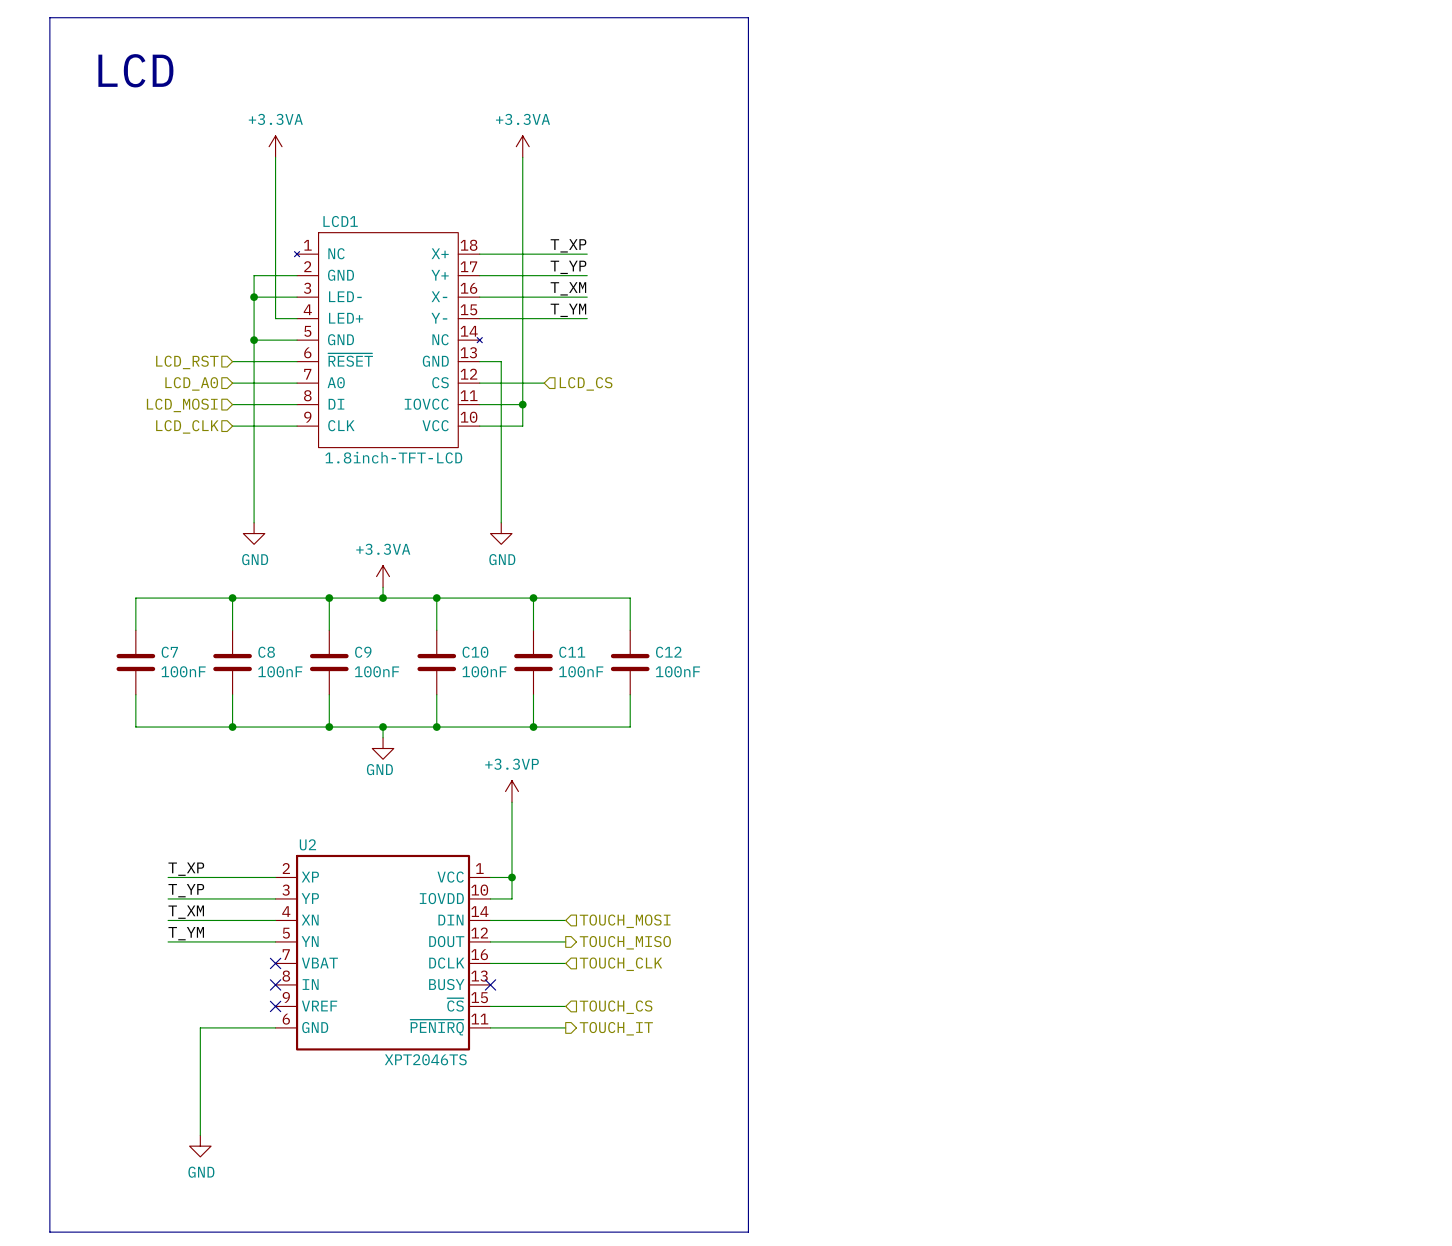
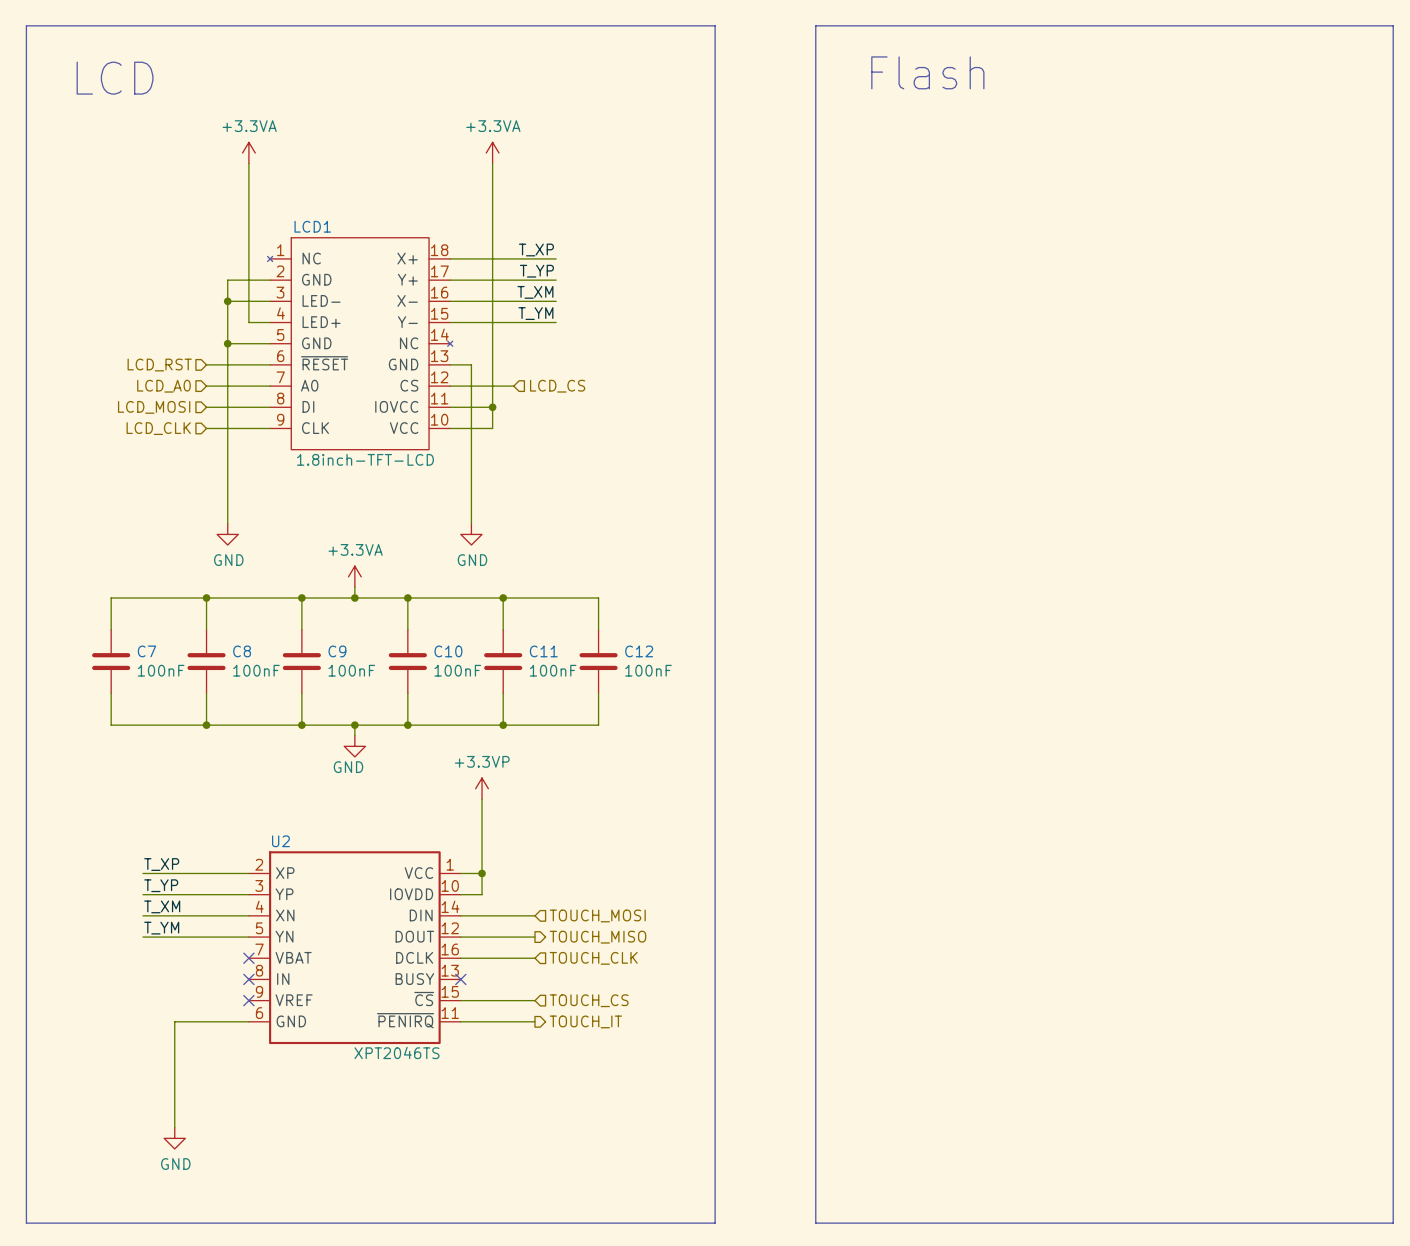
line: none -> (815, 25) (1393, 25) (1393, 1223) (815, 1223) (815, 25)
text: none -> Flash (927, 72)

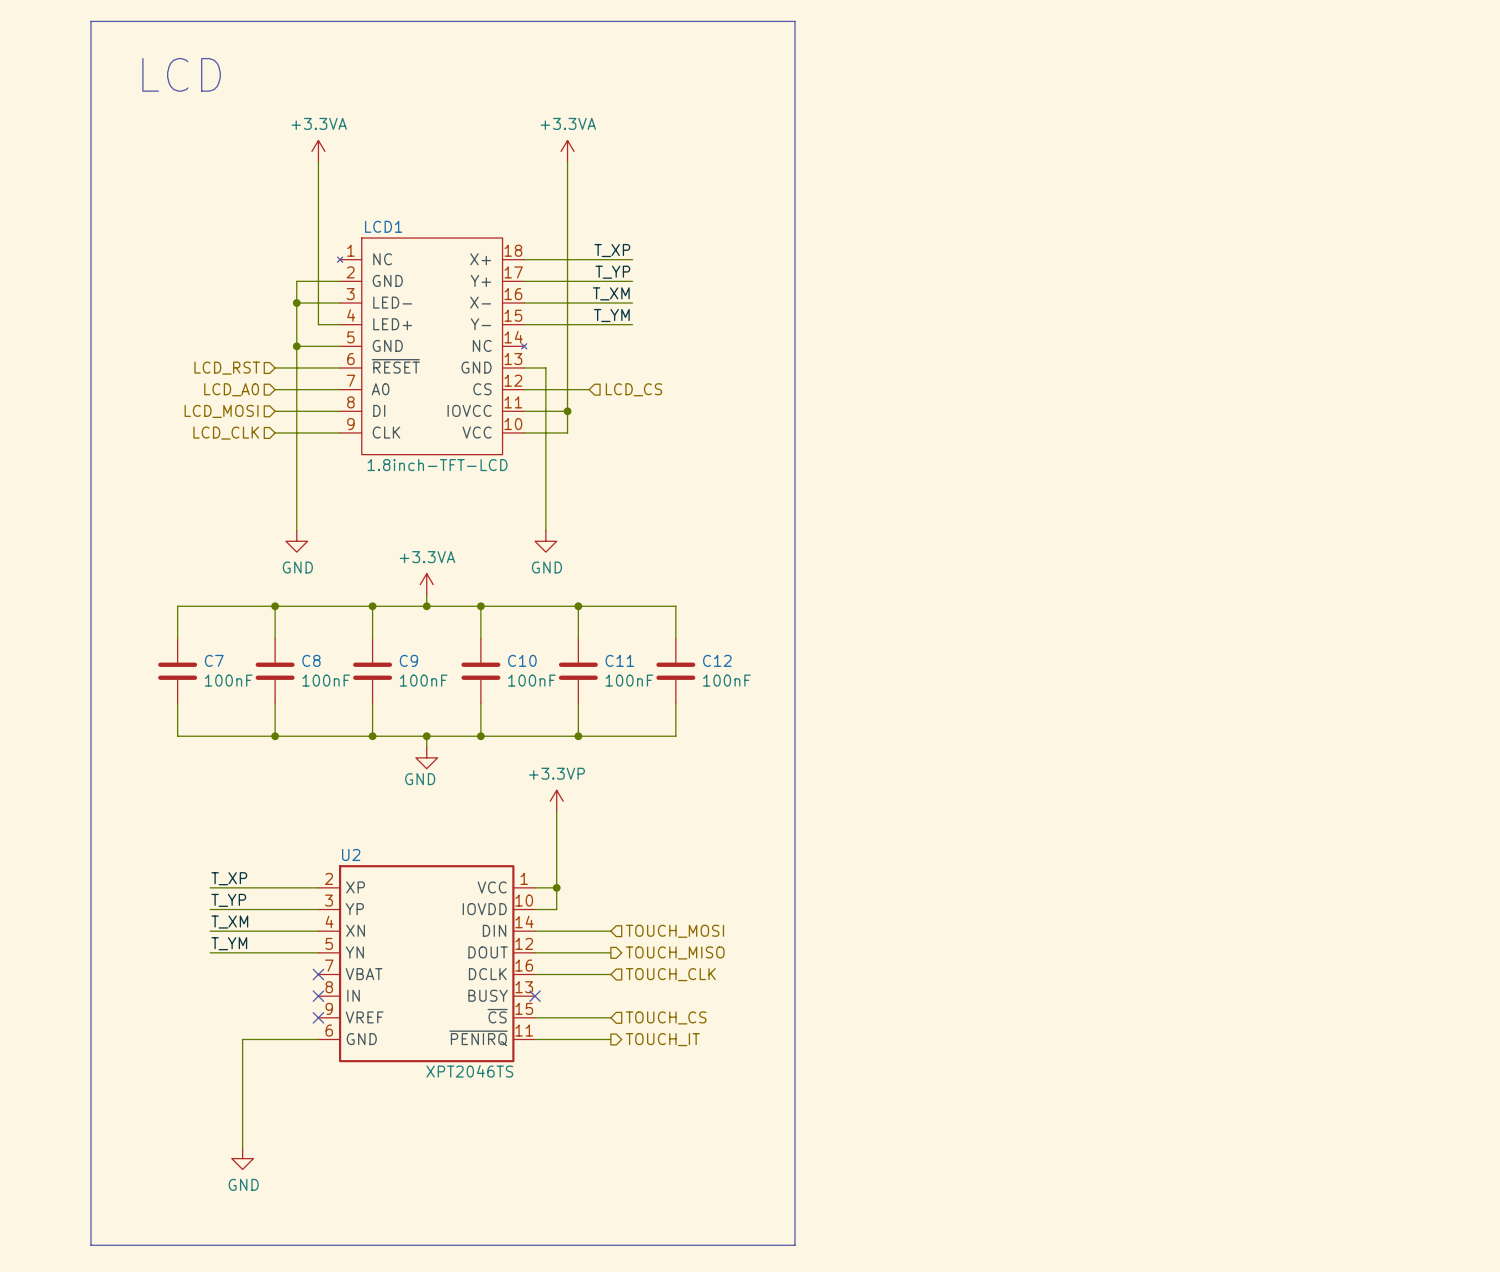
line: (815, 25) (1393, 25) (1393, 1223) (815, 1223) (815, 25) -> none
text: Flash (927, 72) -> none

